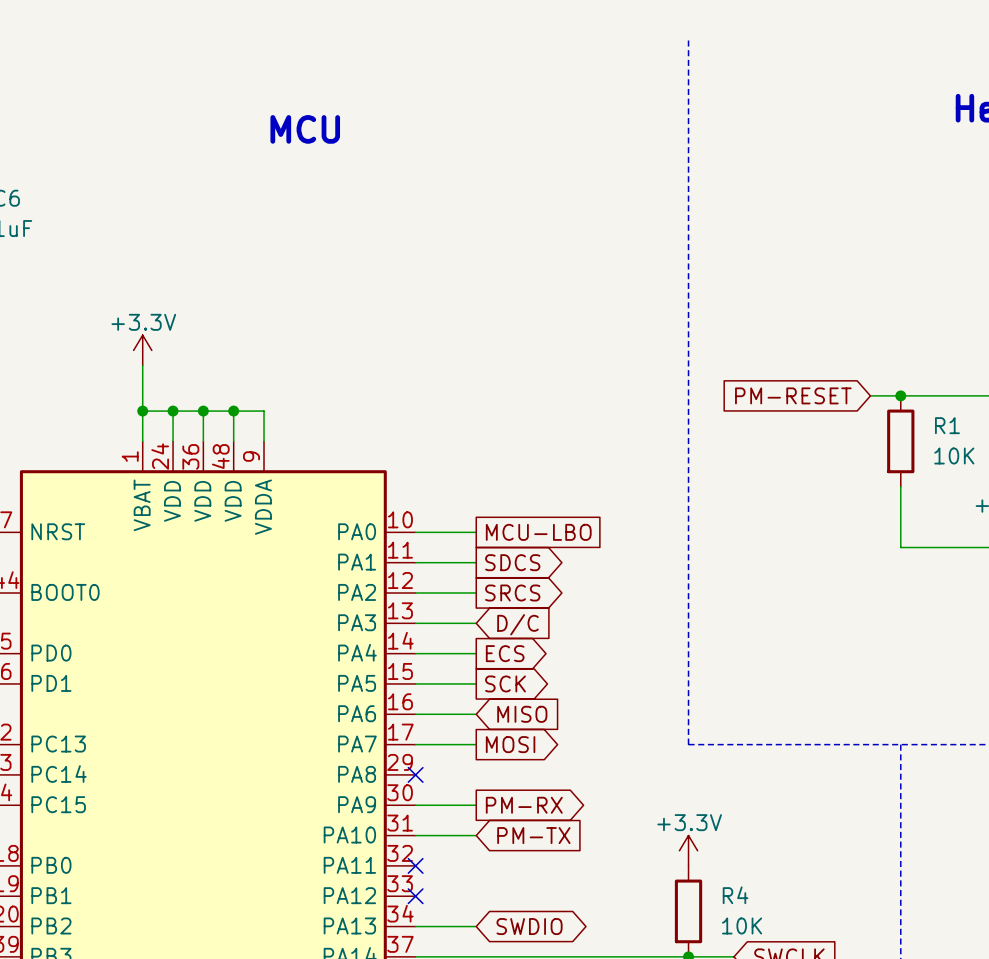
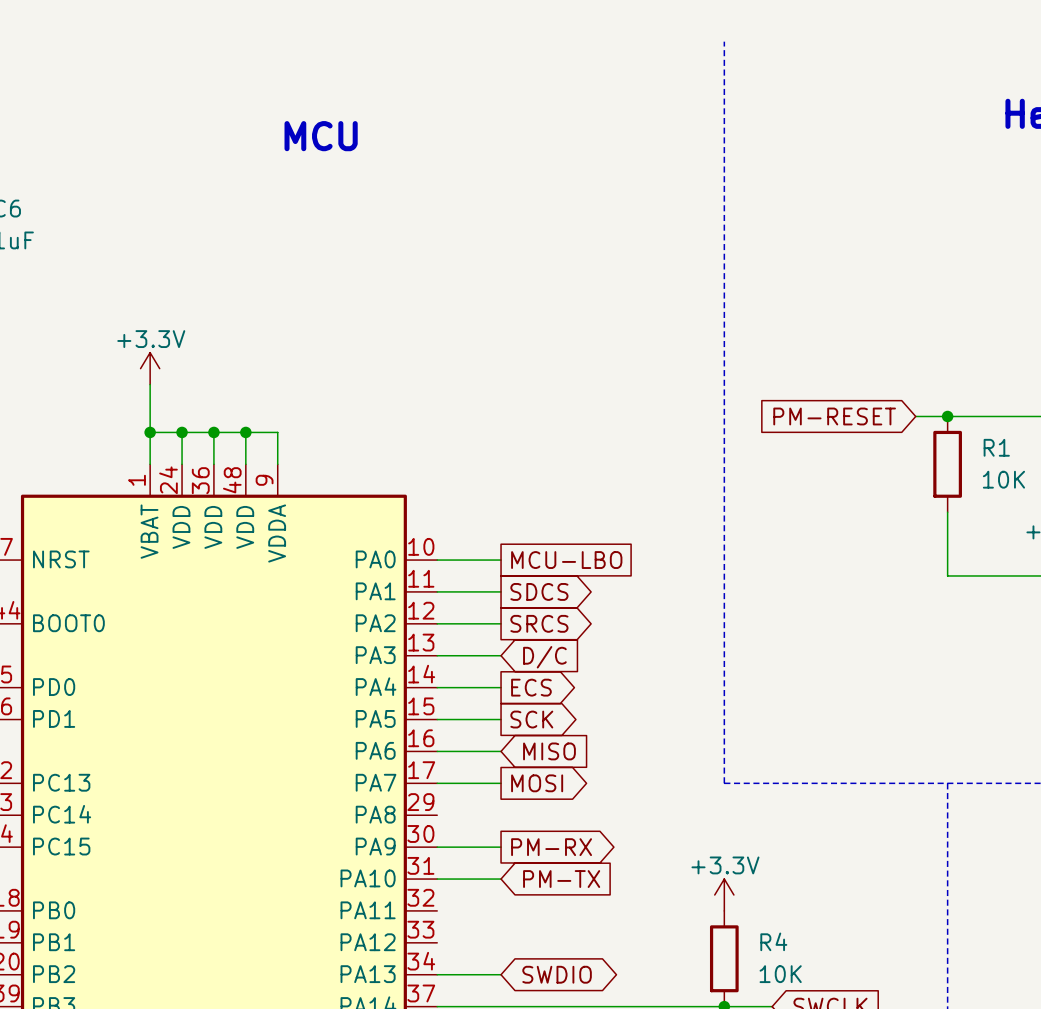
no-connect mark: (415, 774) -> none
no-connect mark: (415, 865) -> none
no-connect mark: (415, 896) -> none

